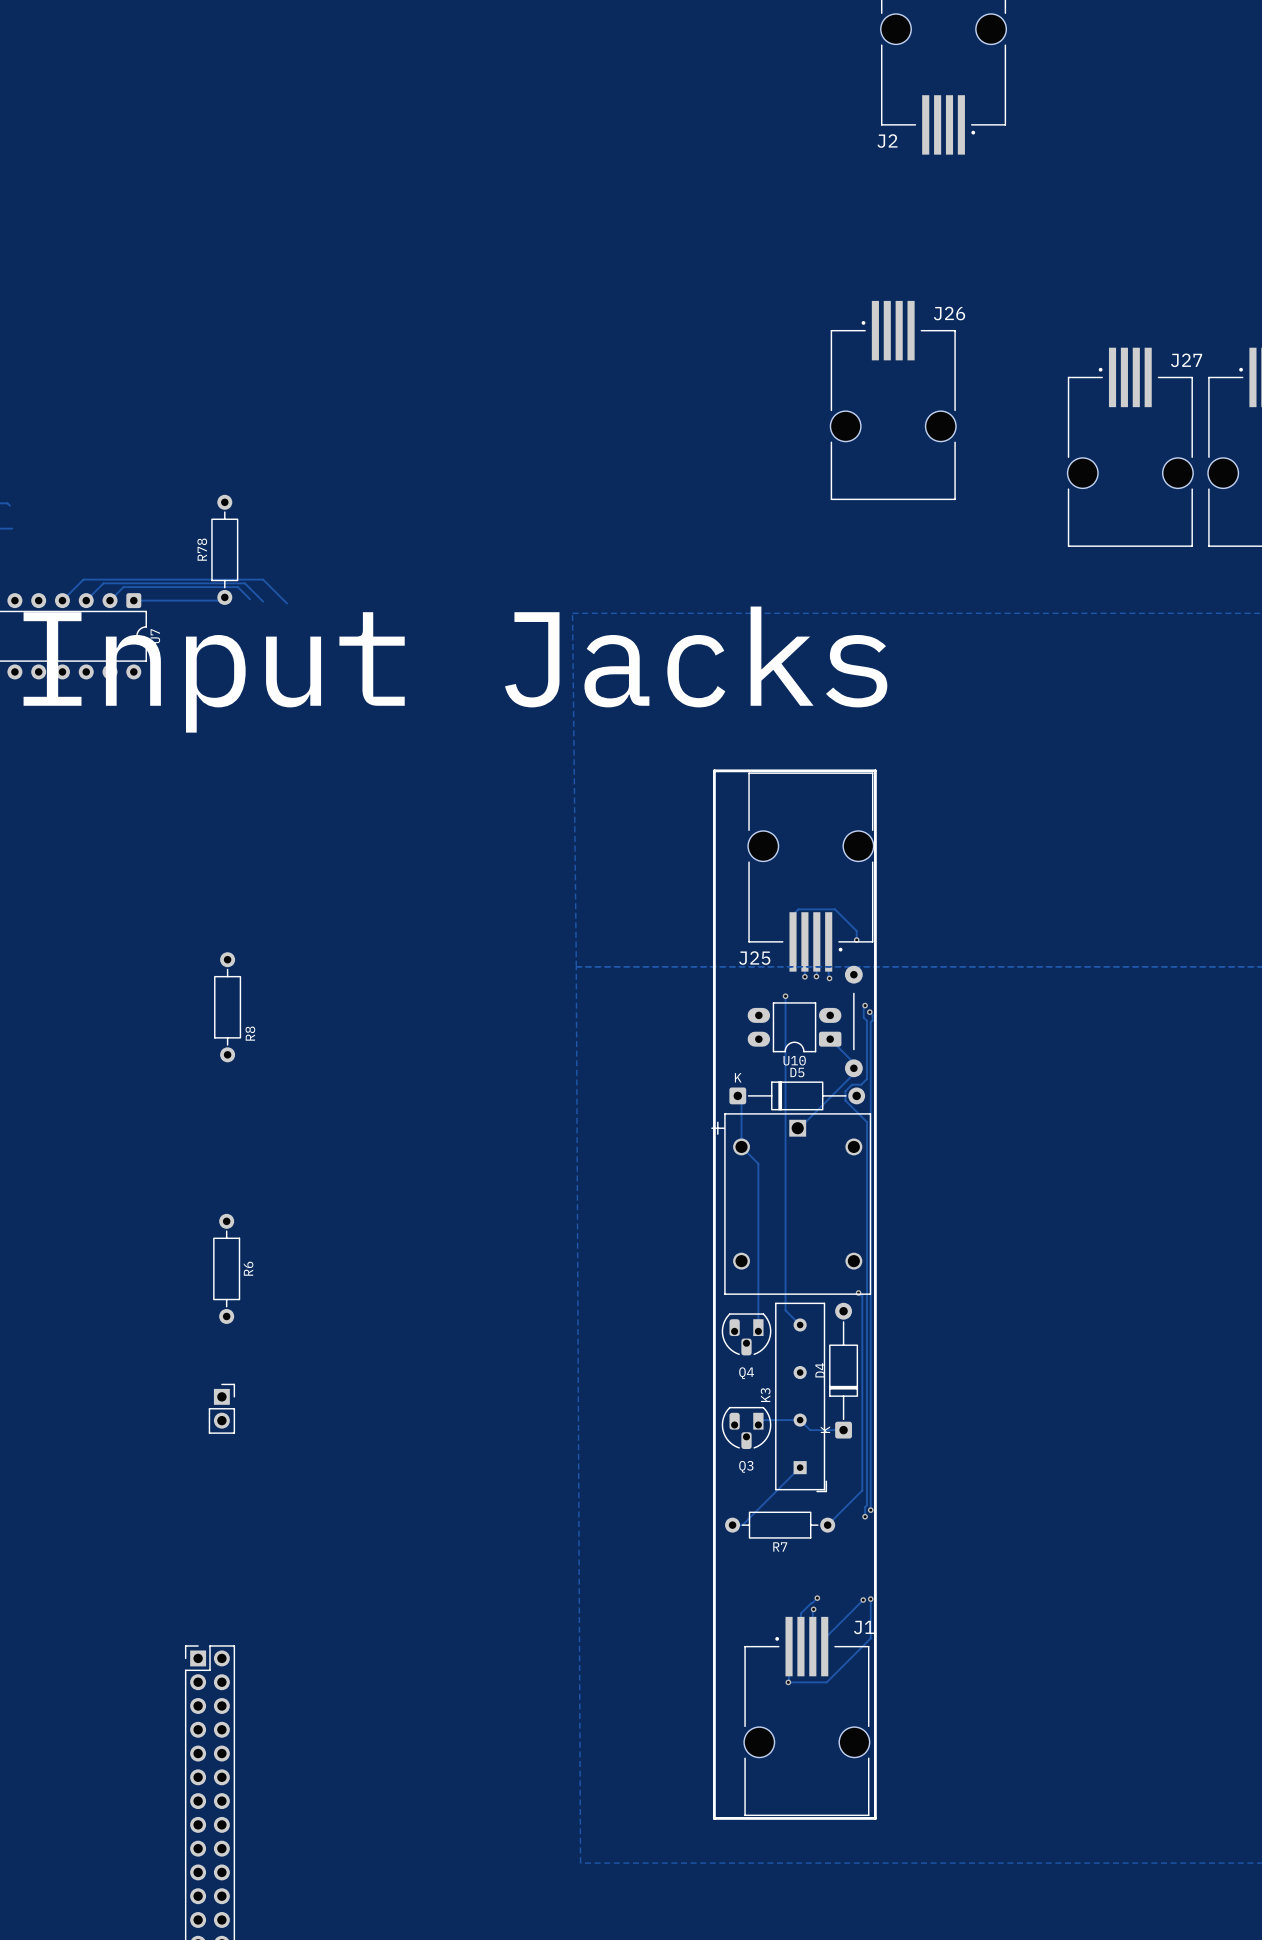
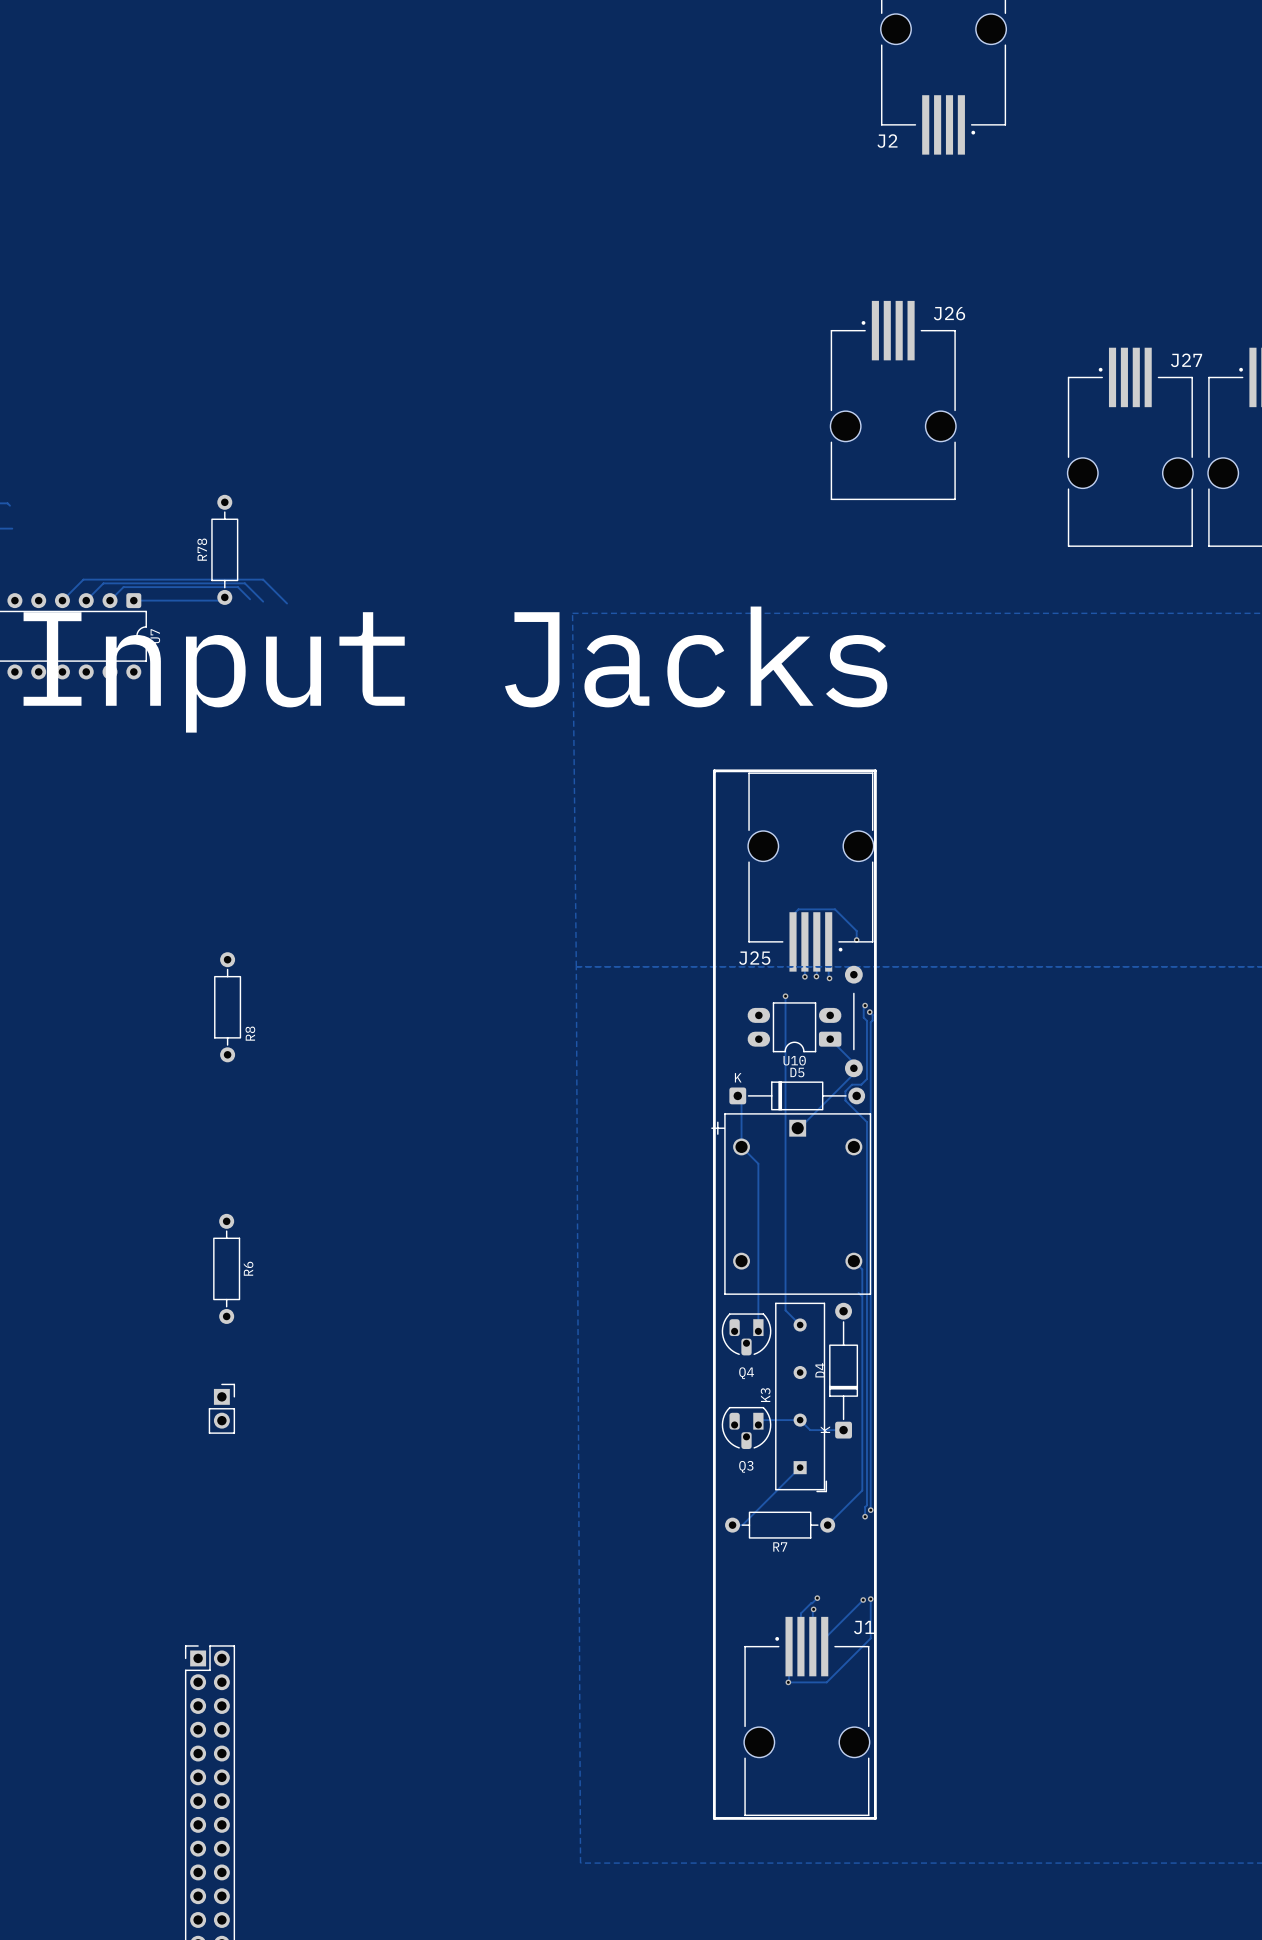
track: none -> (853, 1261) (862, 1269) (862, 1294)
via: (858, 1292) -> none

